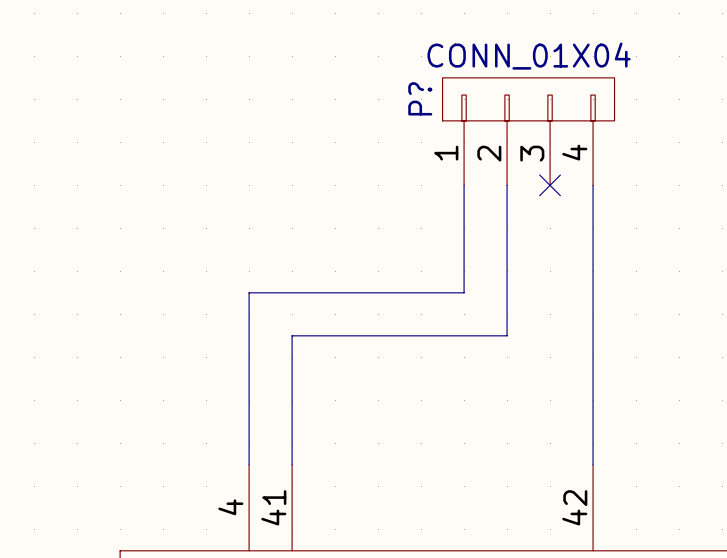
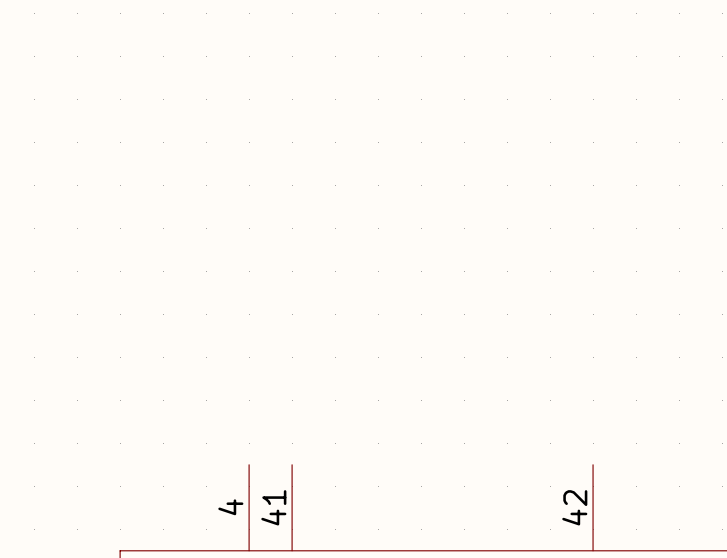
P?: CONN_01X04 (528, 131) -> none
wire: (464, 185) (464, 292) (249, 292) (249, 464) -> none
wire: (507, 185) (507, 335) (292, 335) (292, 464) -> none
no-connect mark: (550, 185) -> none
wire: (593, 185) (593, 464) -> none

